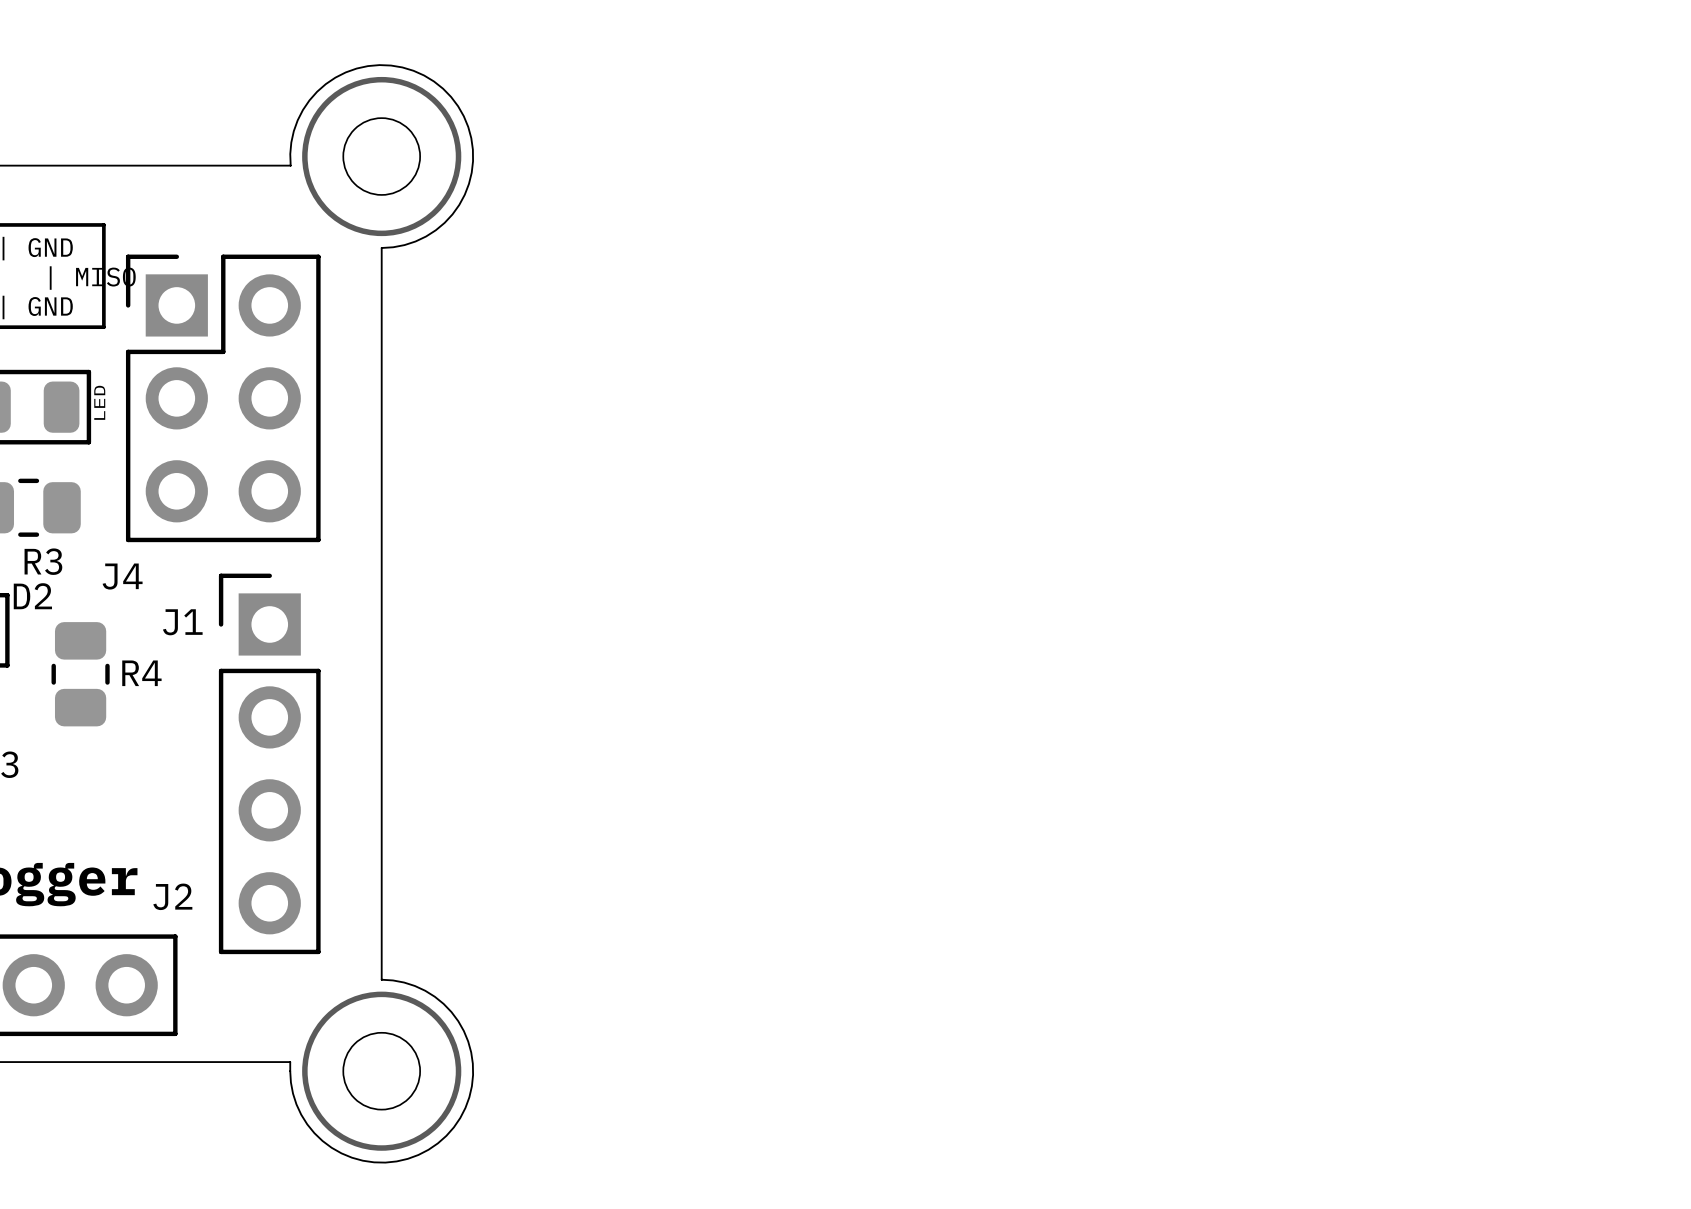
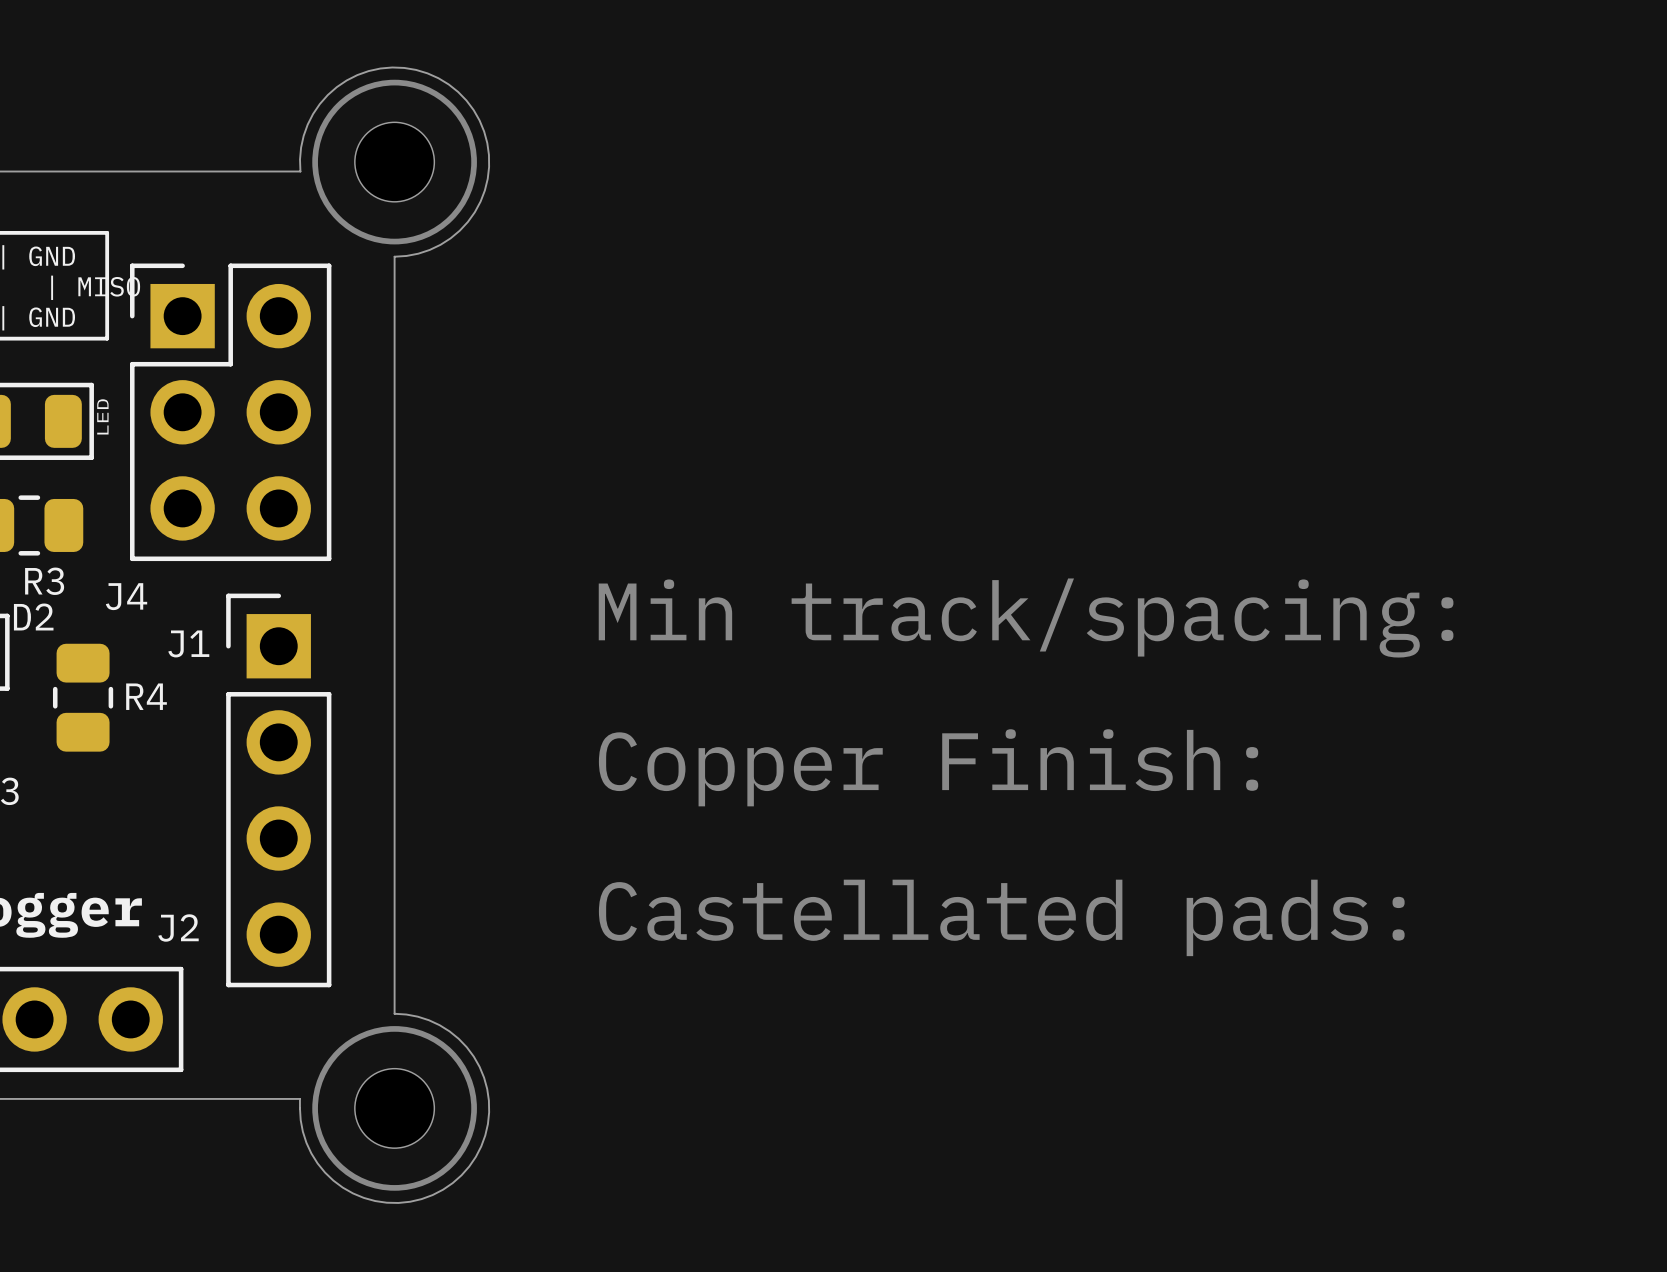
text: none -> Min track/spacing: (1026, 618)
text: none -> Copper Finish: (928, 767)
text: none -> Castellated pads: (1001, 917)

